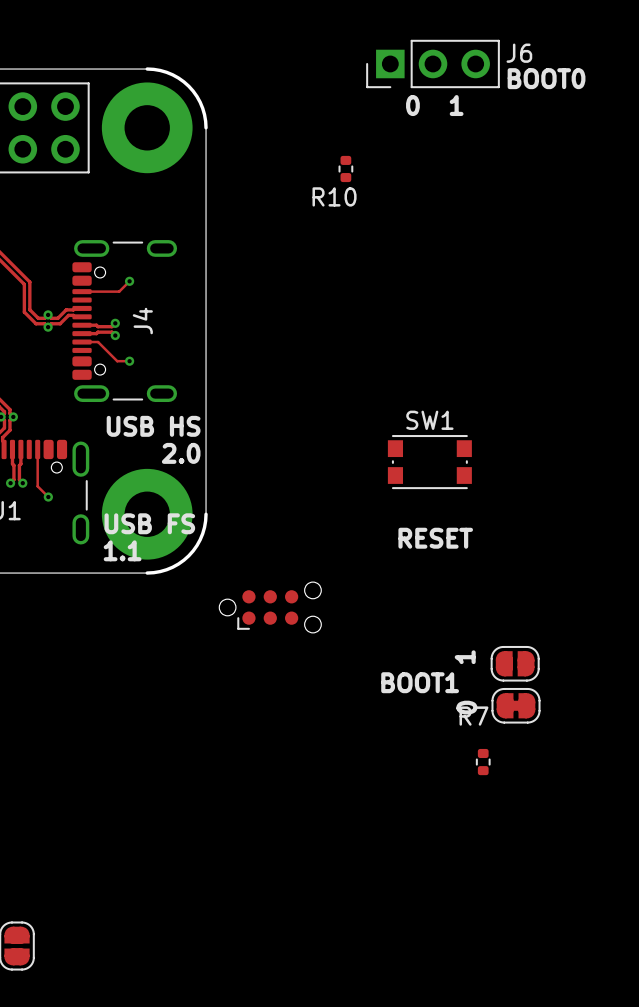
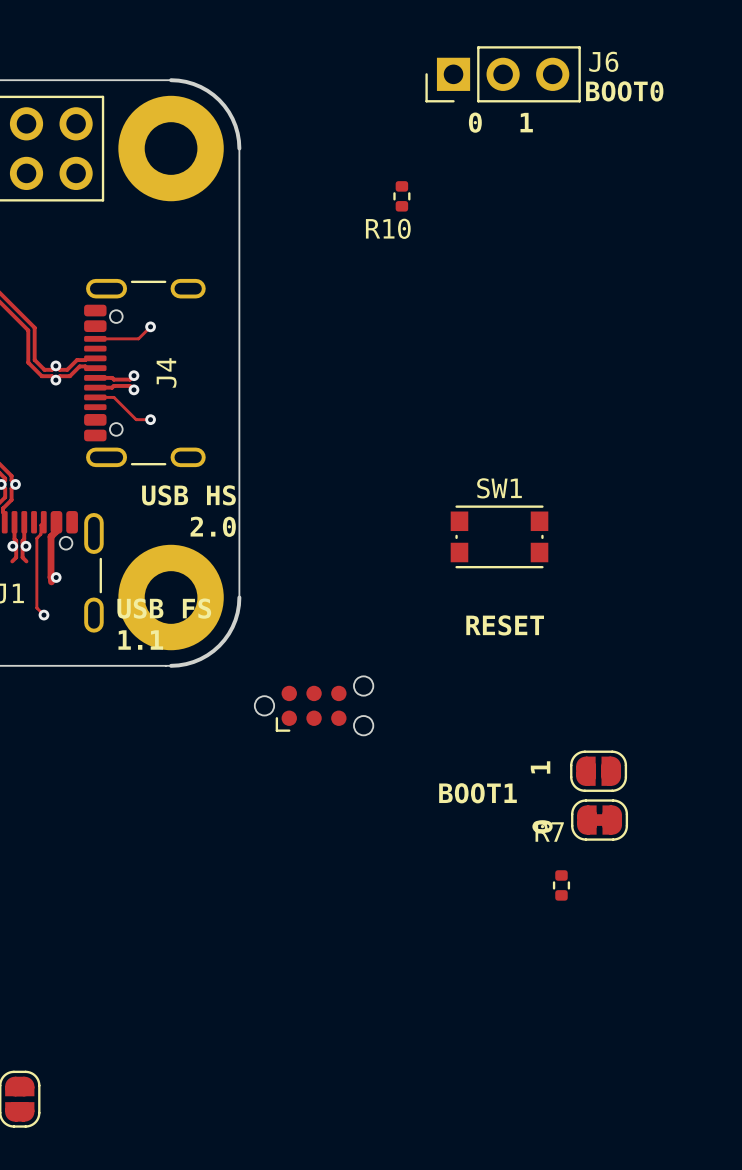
track: (37, 449) (37, 486) (48, 497) -> (43, 522) (40, 525) (40, 534) (36, 538) (36, 607) (43, 615)
track: none -> (56, 522) (56, 531) (51, 536) (51, 581)
via: none -> (12, 546)
via: none -> (25, 546)
via: (10, 483) -> none
via: (22, 483) -> none
via: none -> (43, 615)

